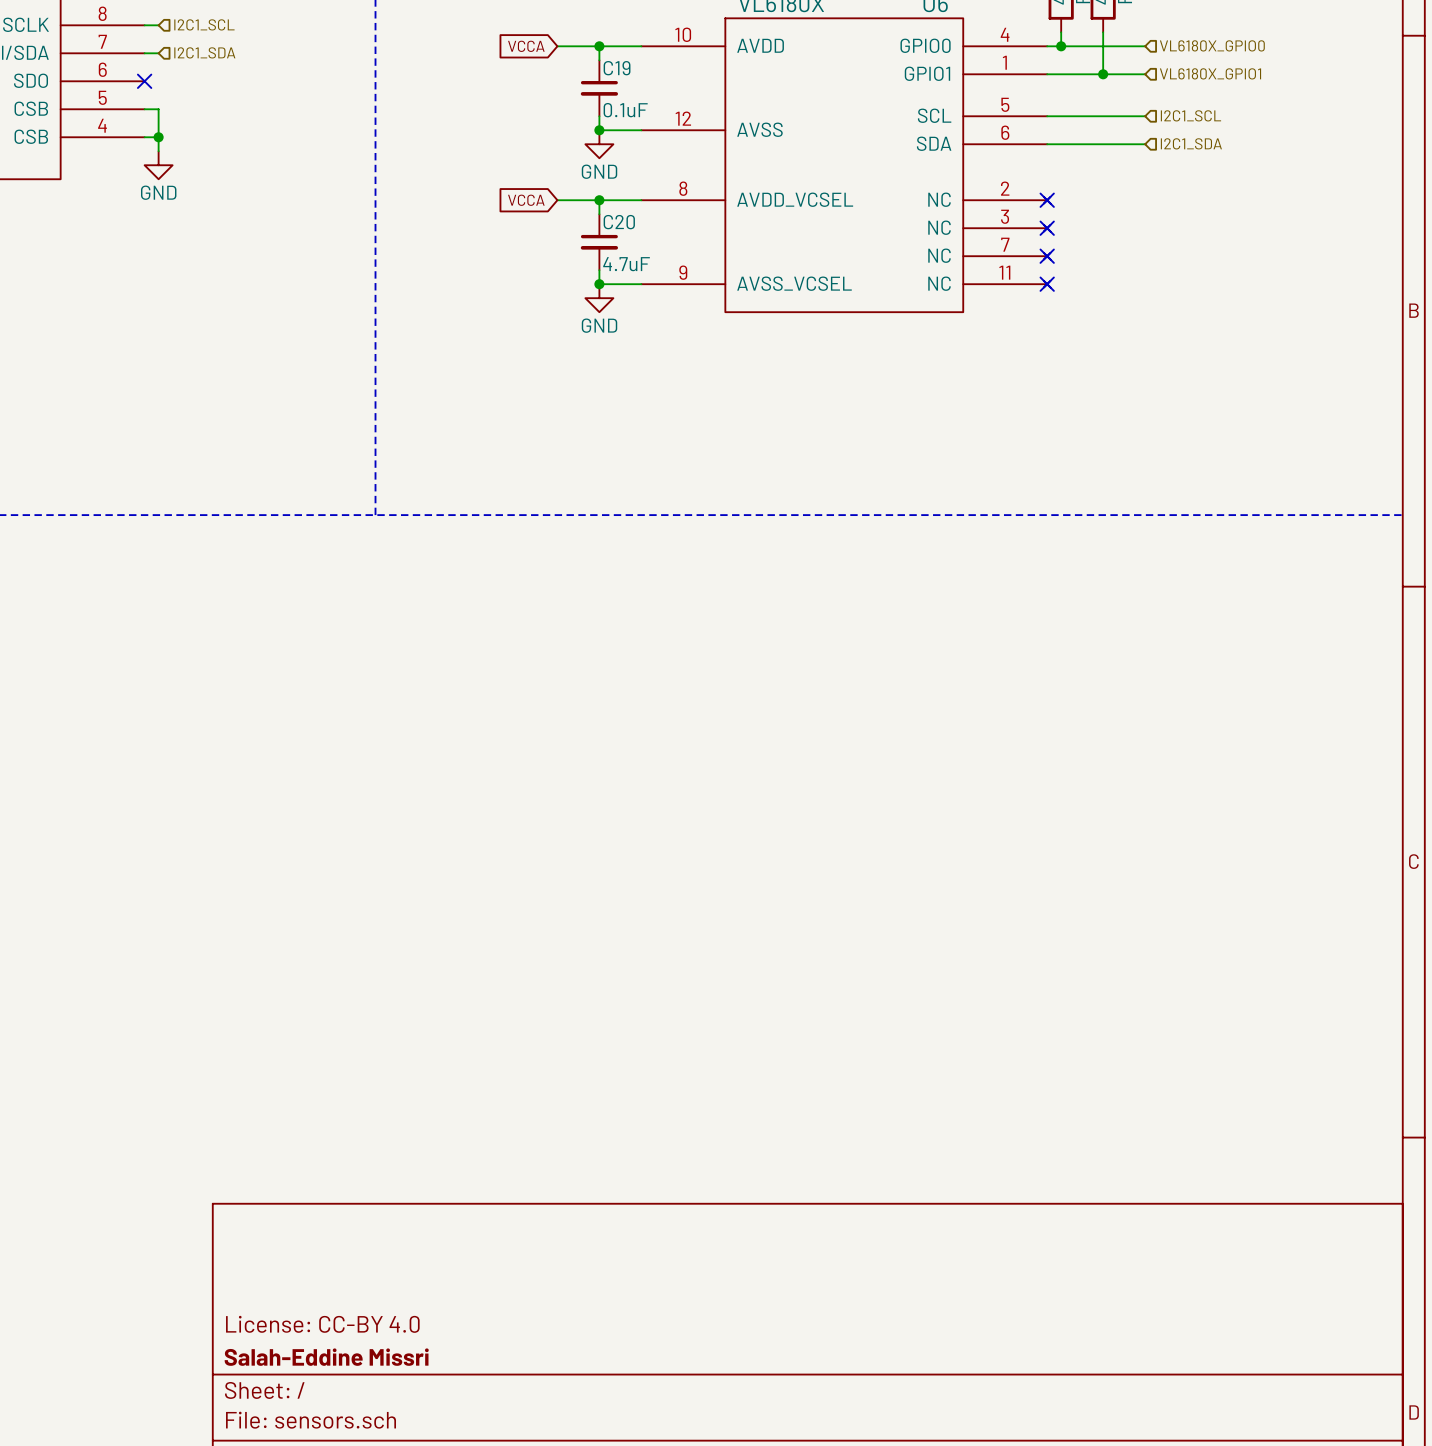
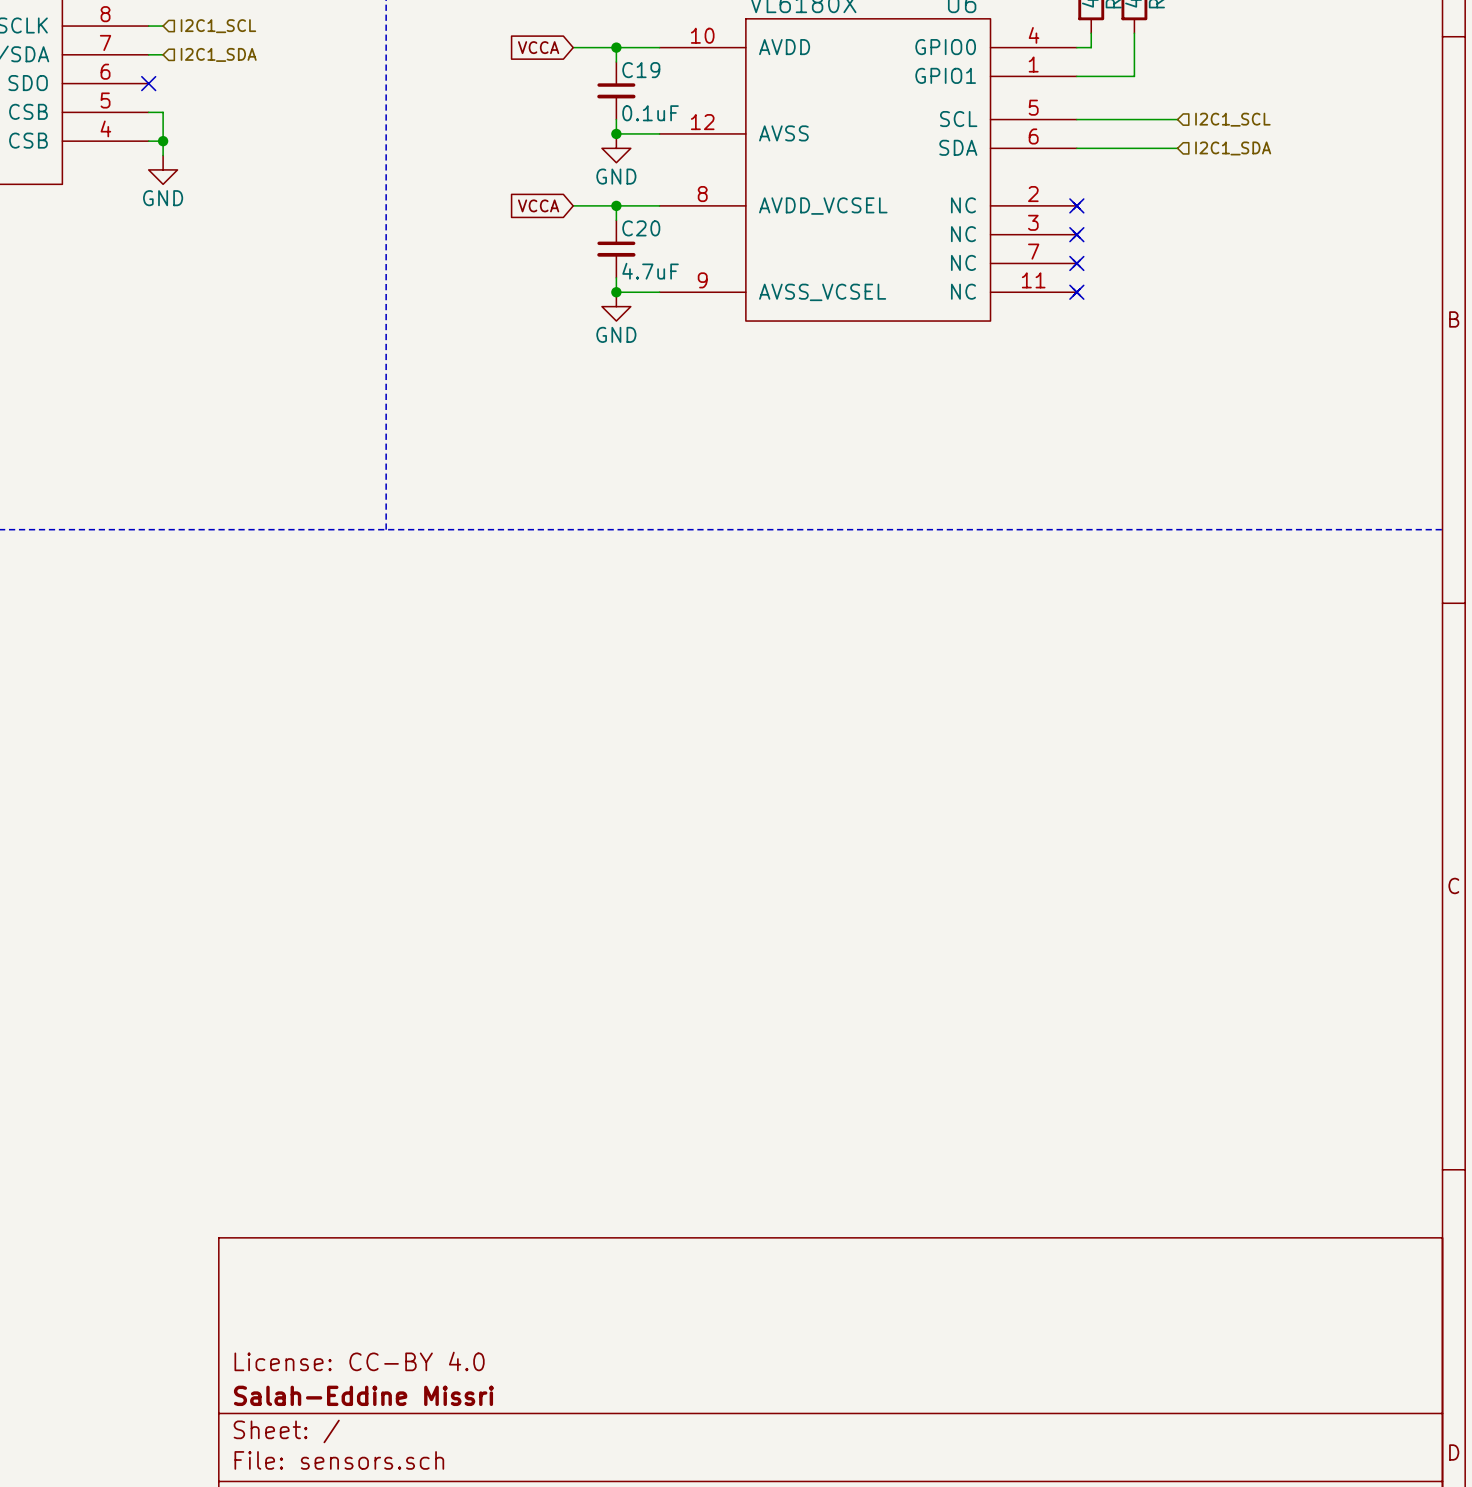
hierarchical label: VL6180X_GPIO0 (1212, 45) -> none
wire: (1061, 46) (1145, 46) -> none
junction: (1061, 46) -> none
hierarchical label: VL6180X_GPIO1 (1210, 73) -> none
wire: (1103, 74) (1145, 74) -> none
junction: (1103, 74) -> none

